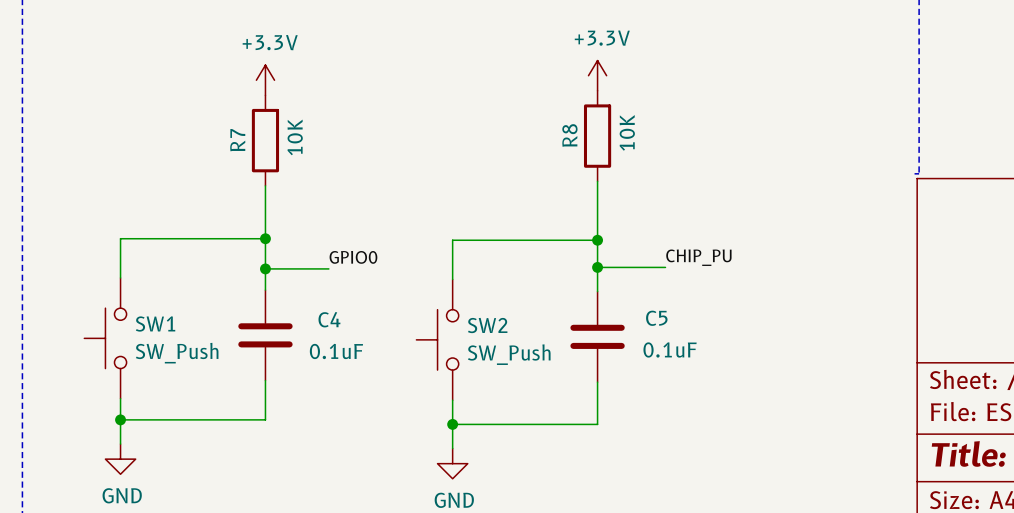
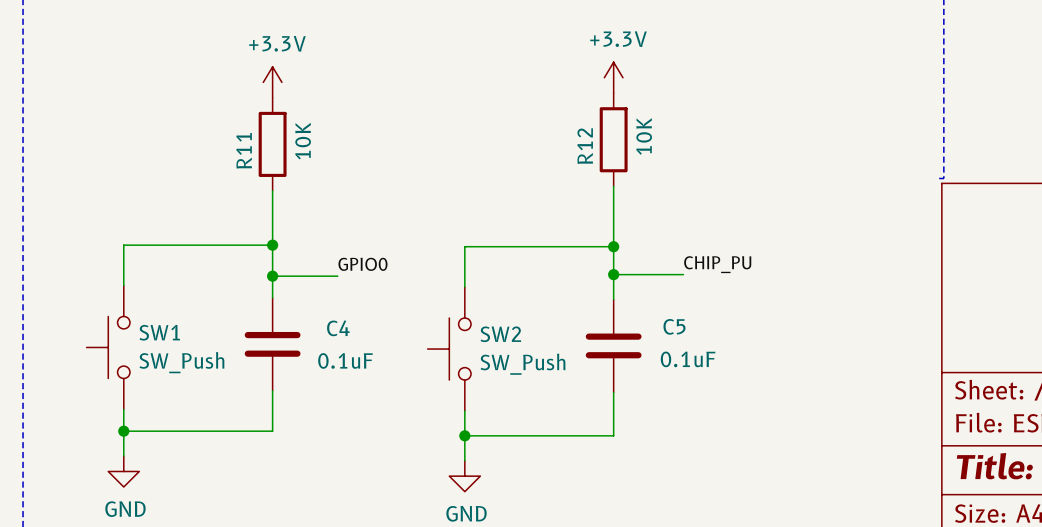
R8 name: R8 (569, 135) -> R12 (585, 146)
R7 name: R7 (237, 140) -> R11 (244, 150)

